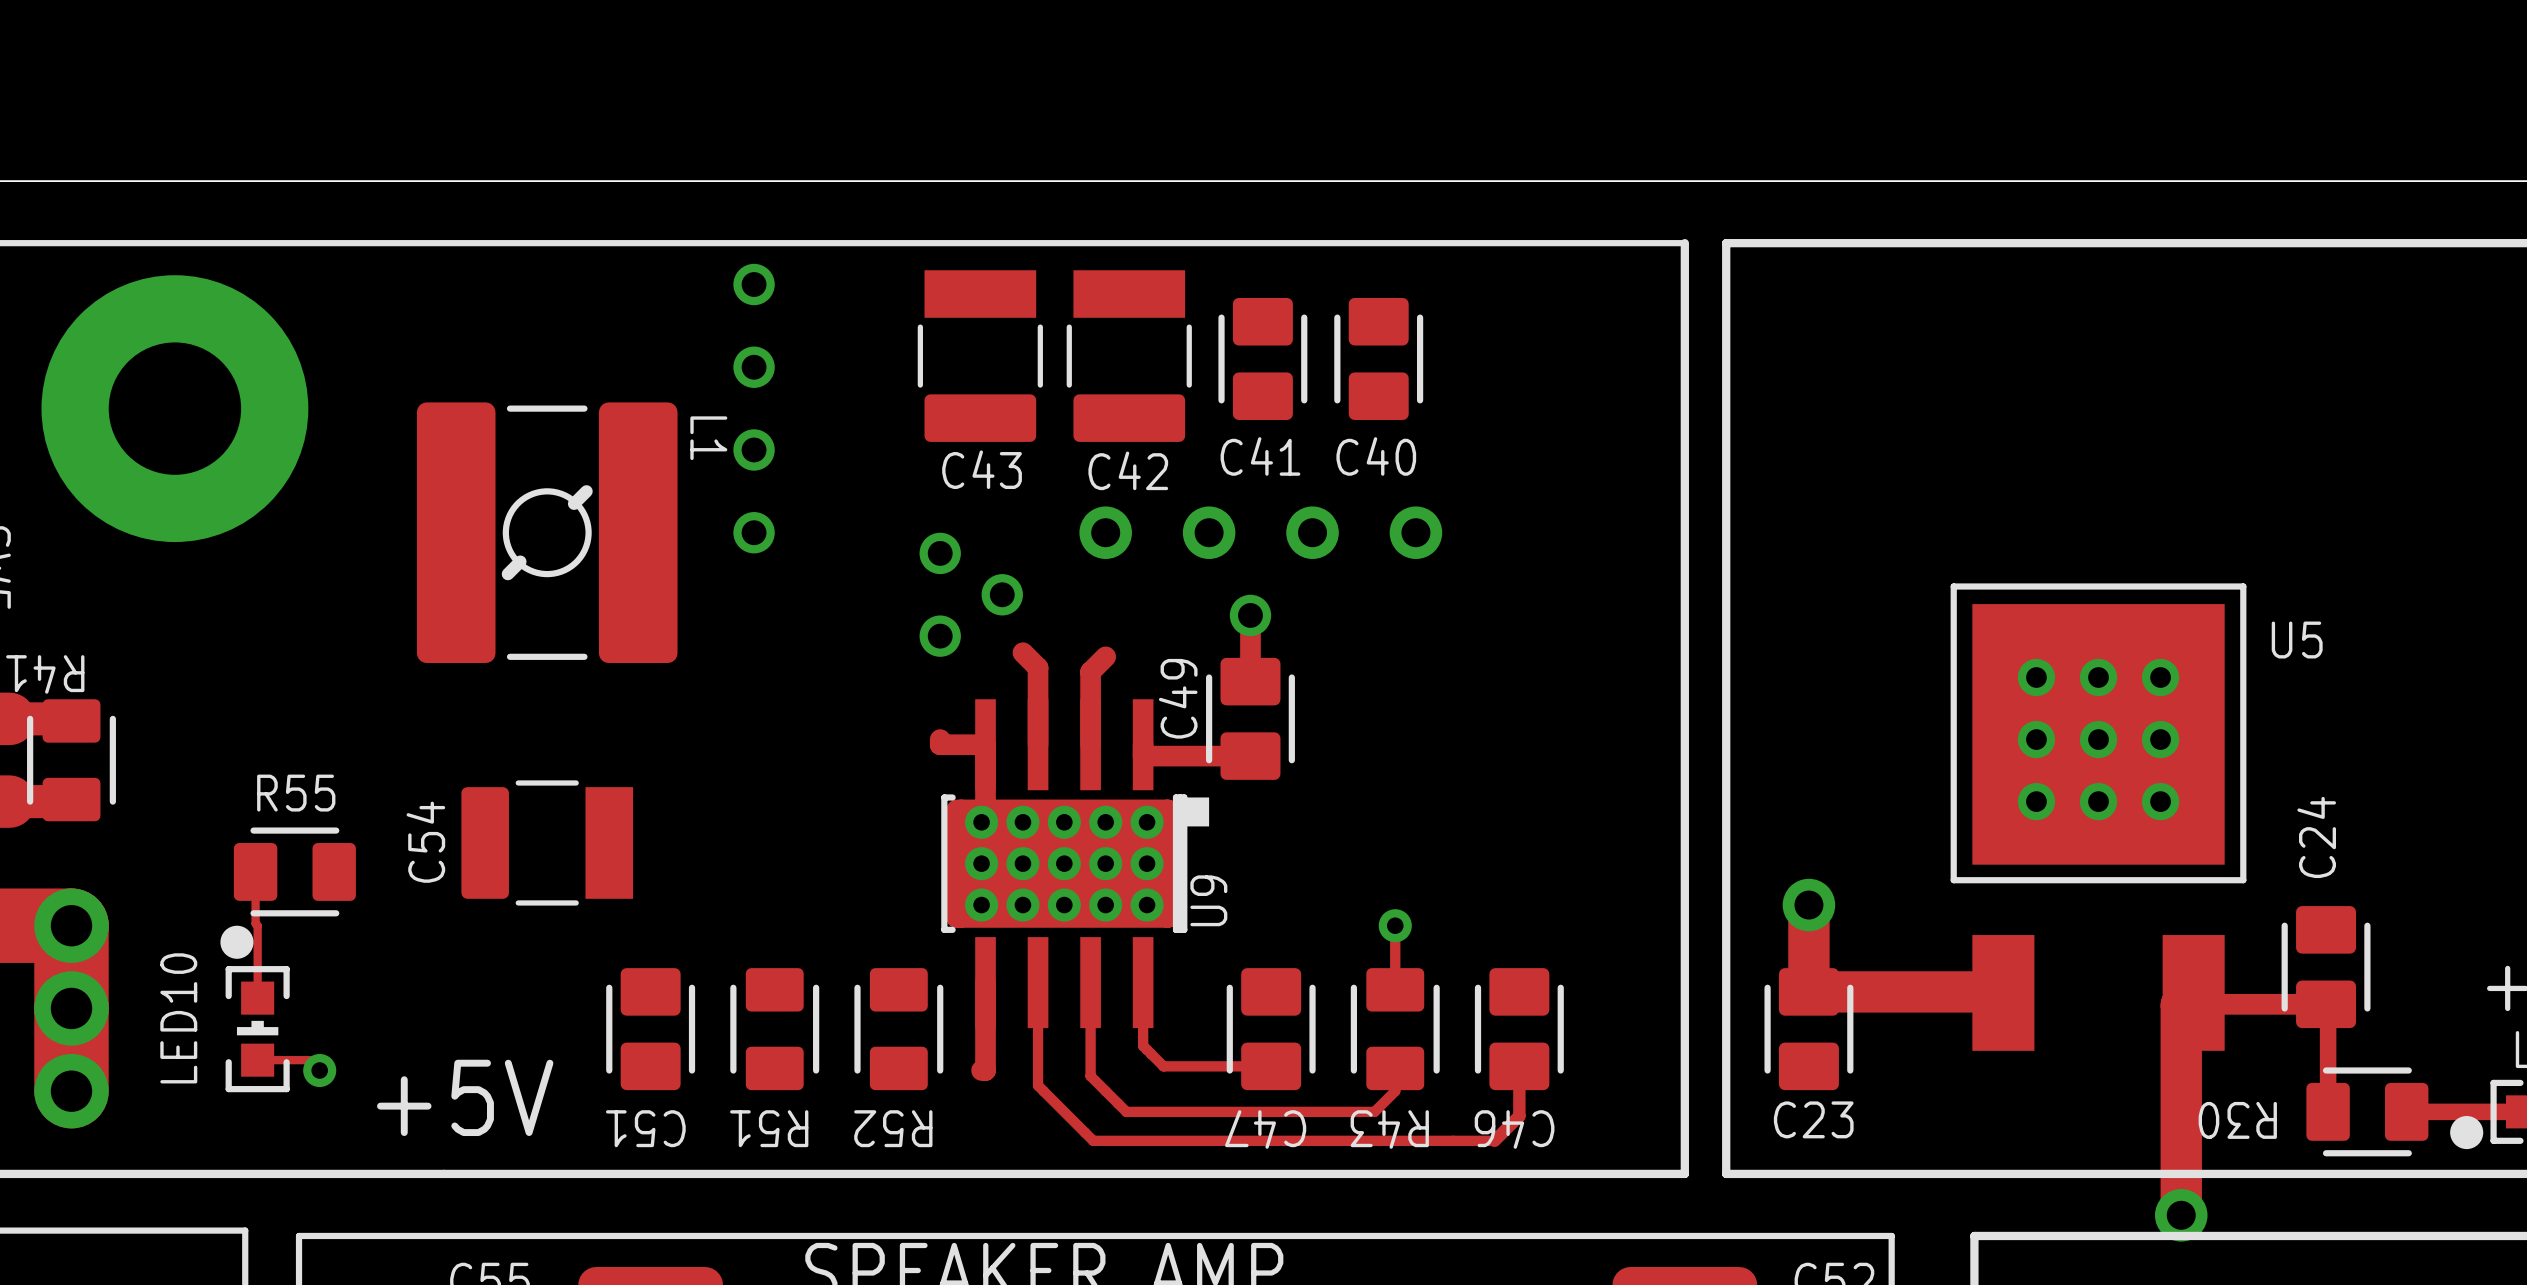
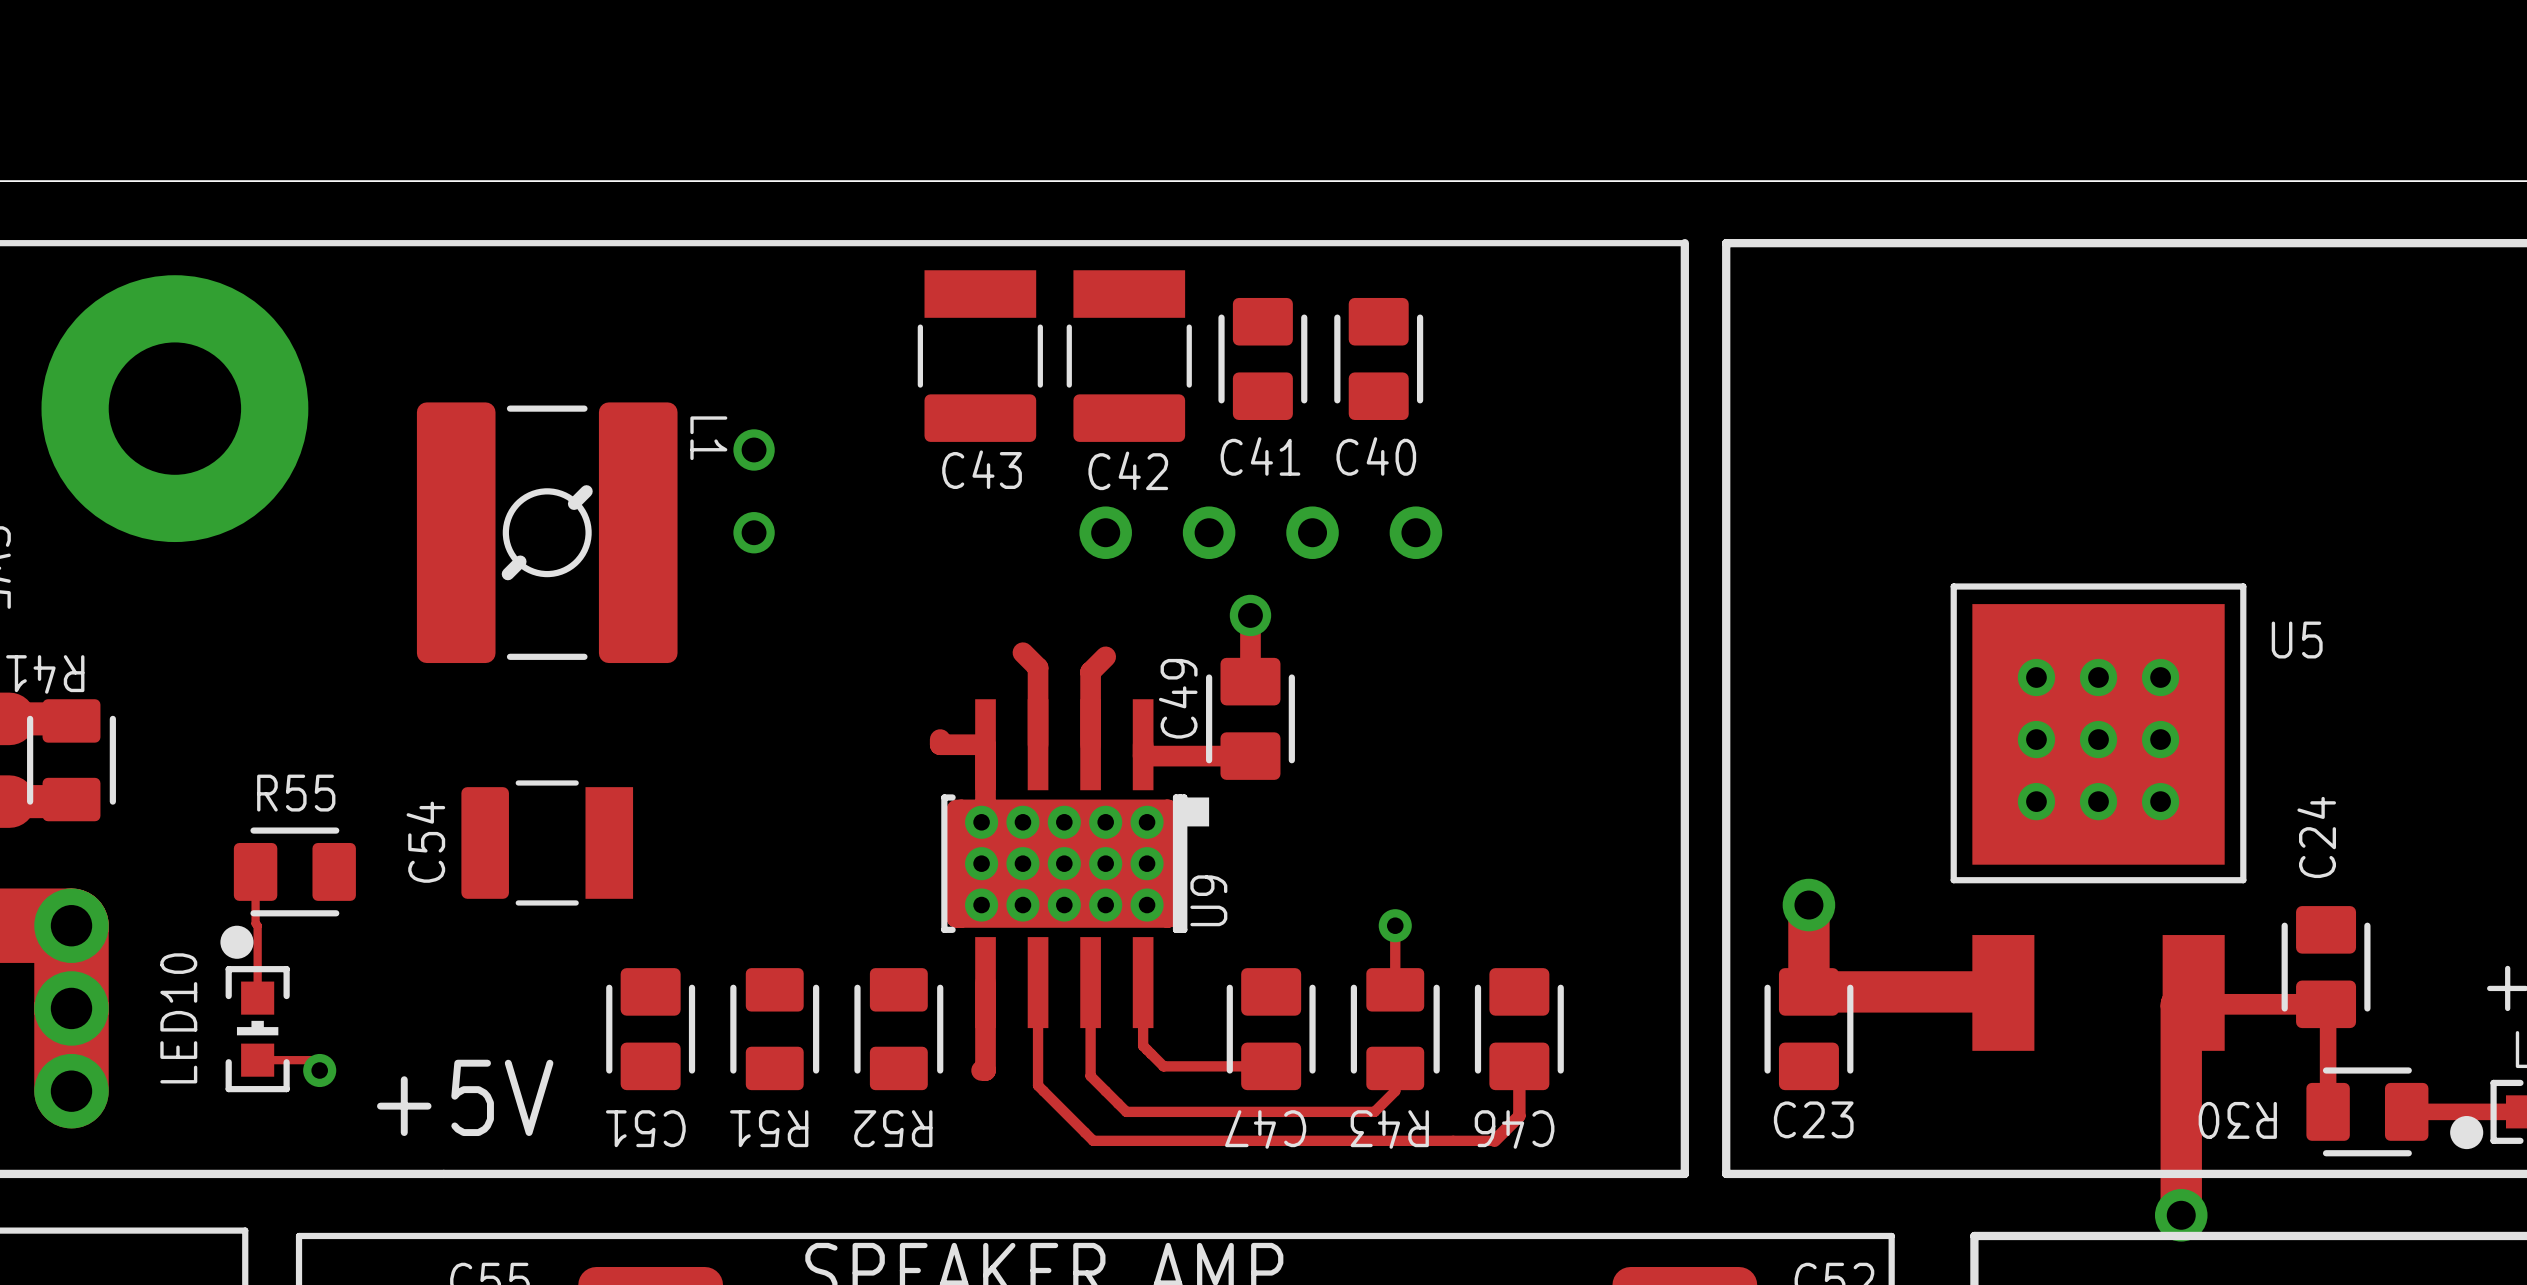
via: (754, 284) -> none
via: (754, 367) -> none
via: (940, 553) -> none
via: (1002, 594) -> none
via: (940, 636) -> none

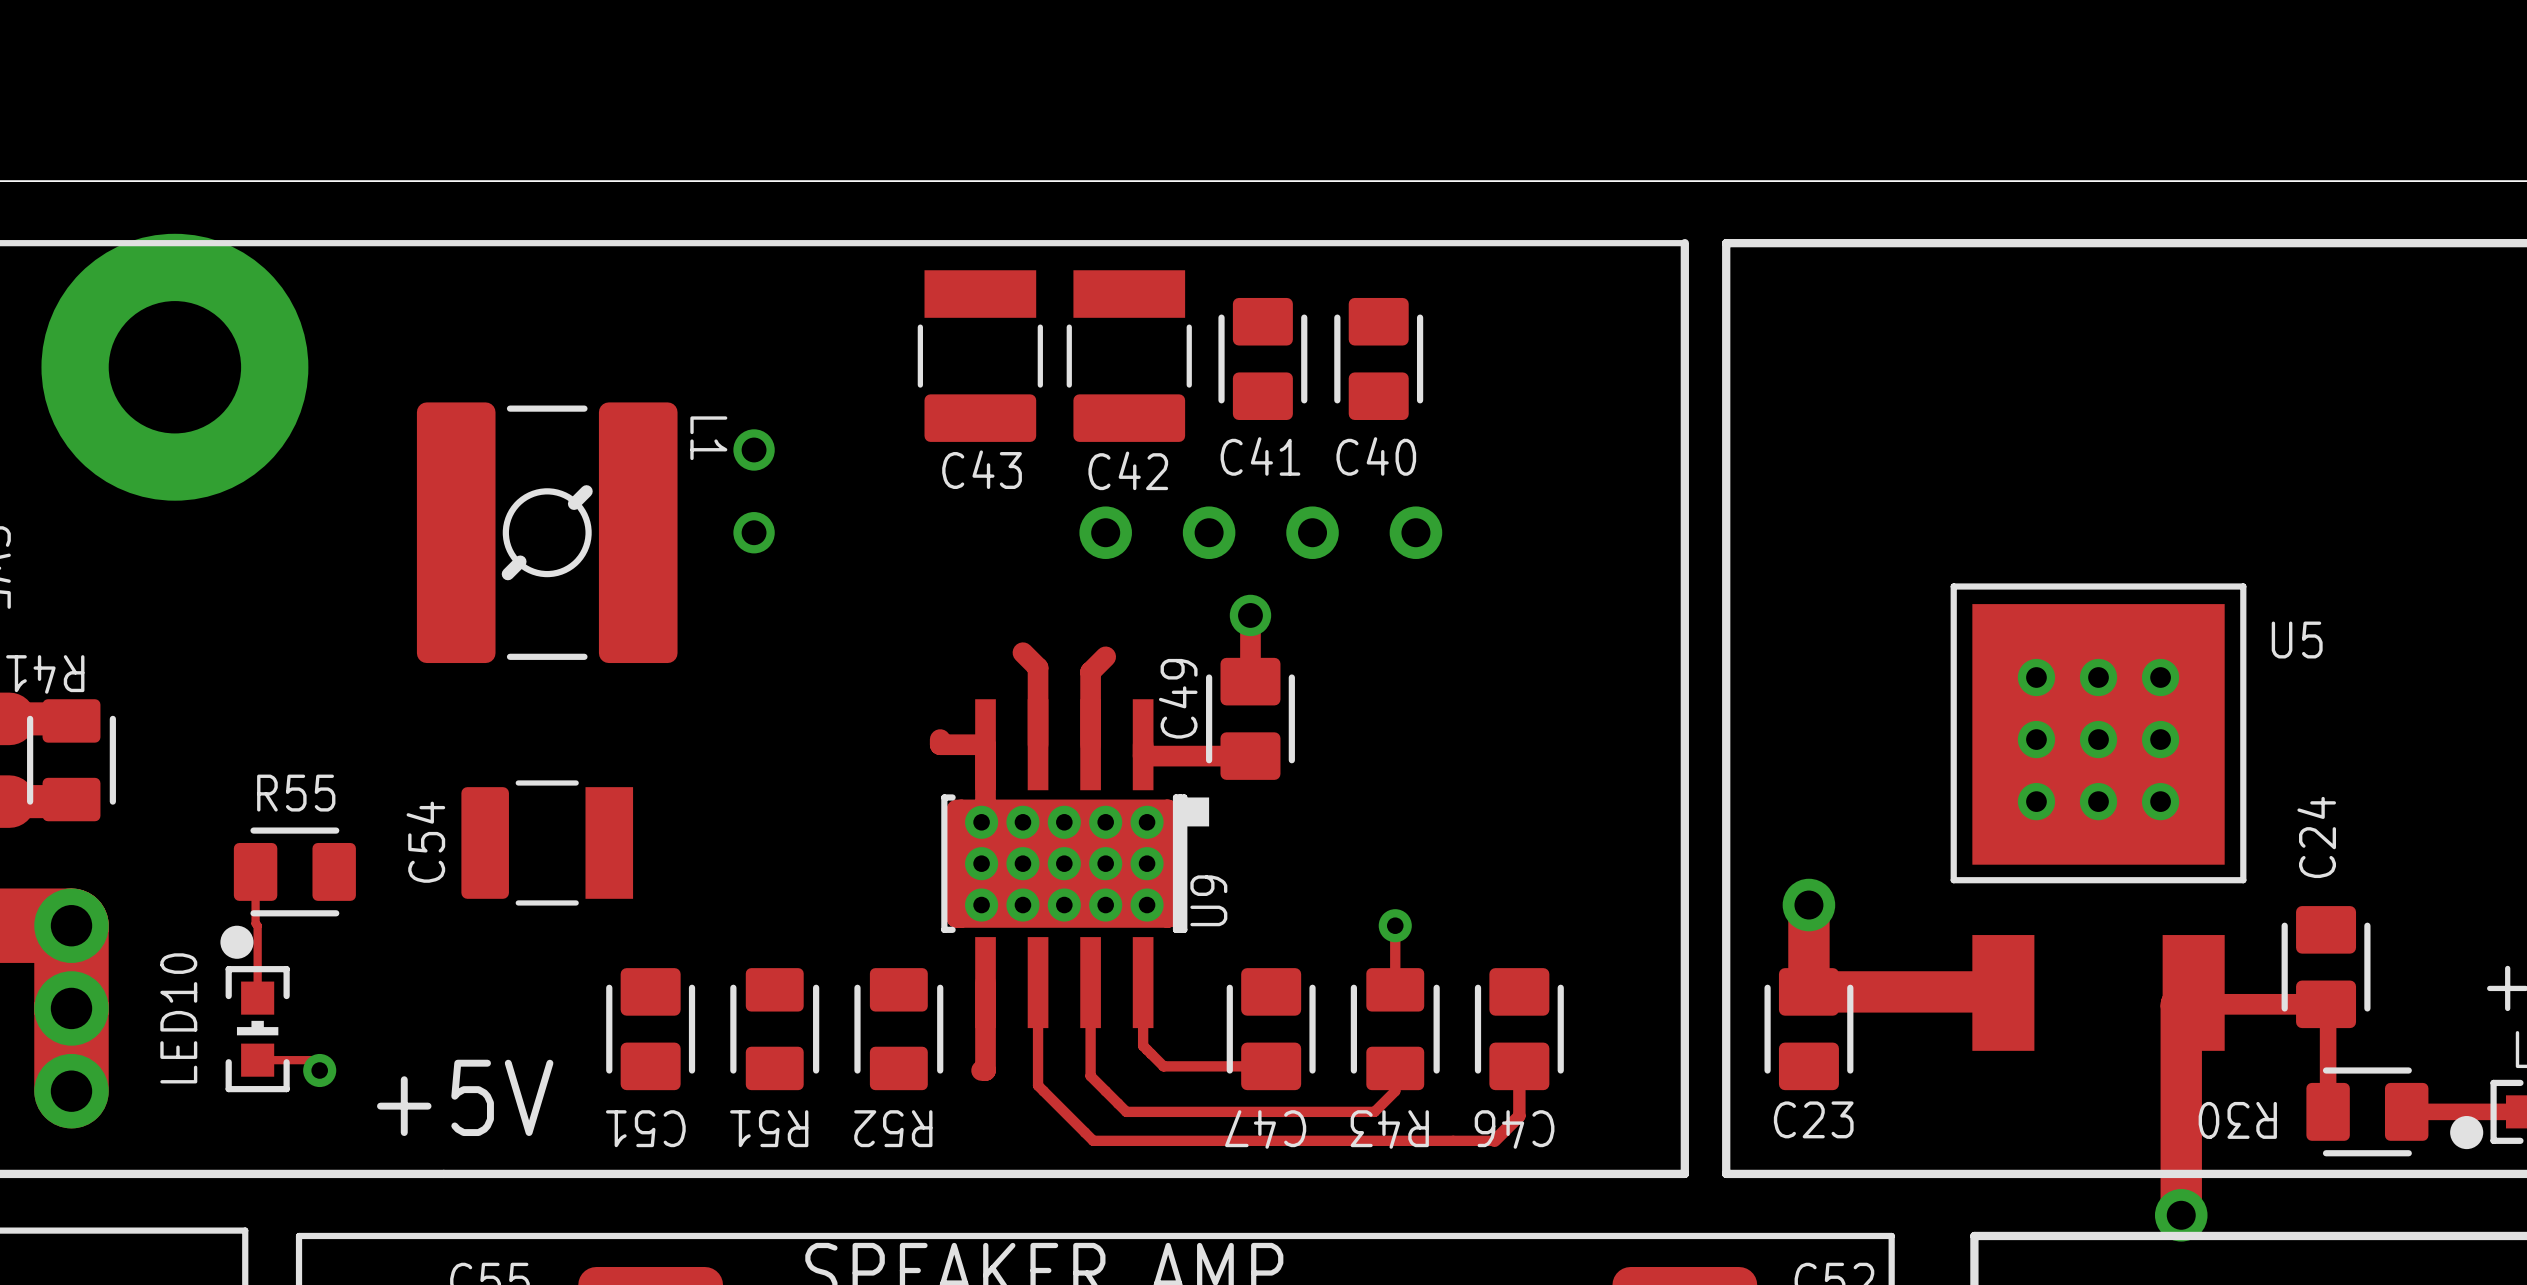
part: none -> (174, 367)
via: (174, 408) -> none

